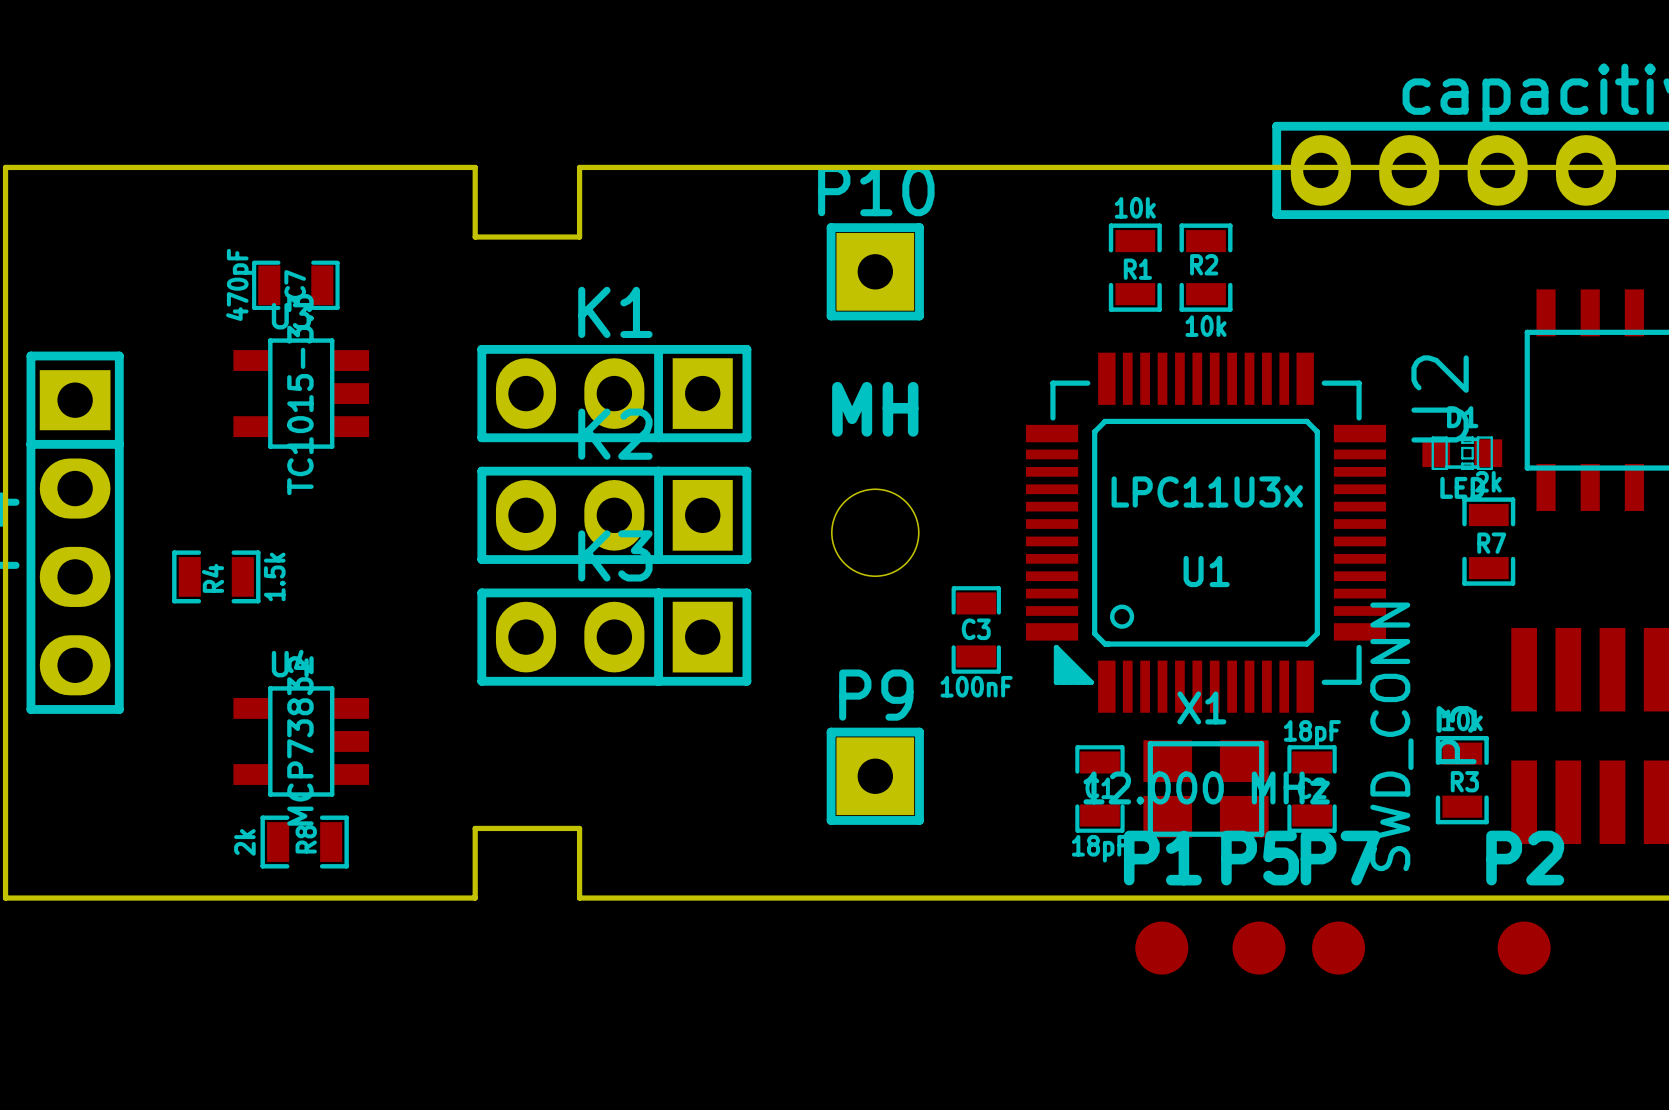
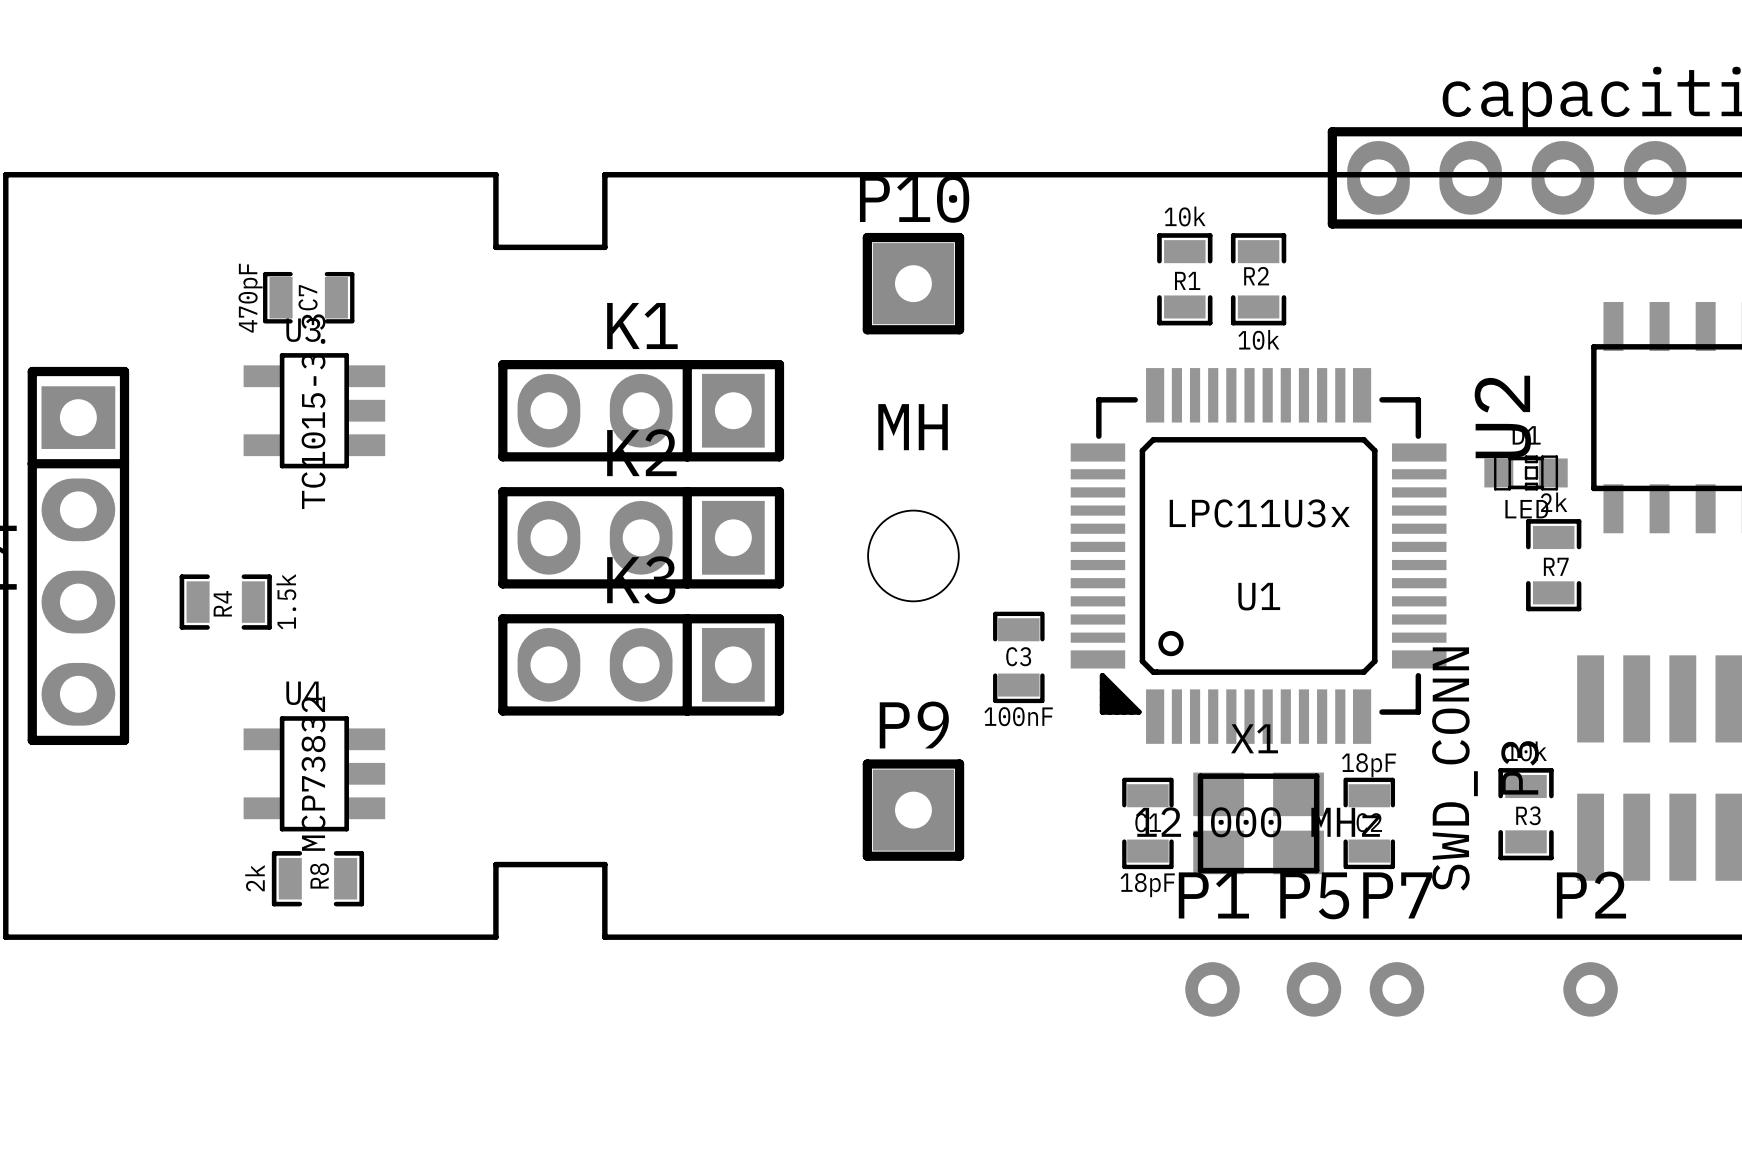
P1 footprint: [1135, 921, 1189, 975] -> [1185, 962, 1240, 1017]
P5 footprint: [1232, 921, 1286, 975] -> [1286, 962, 1342, 1017]
P7 footprint: [1312, 921, 1366, 975] -> [1369, 962, 1425, 1017]
P2 footprint: [1497, 921, 1551, 975] -> [1563, 962, 1618, 1017]

